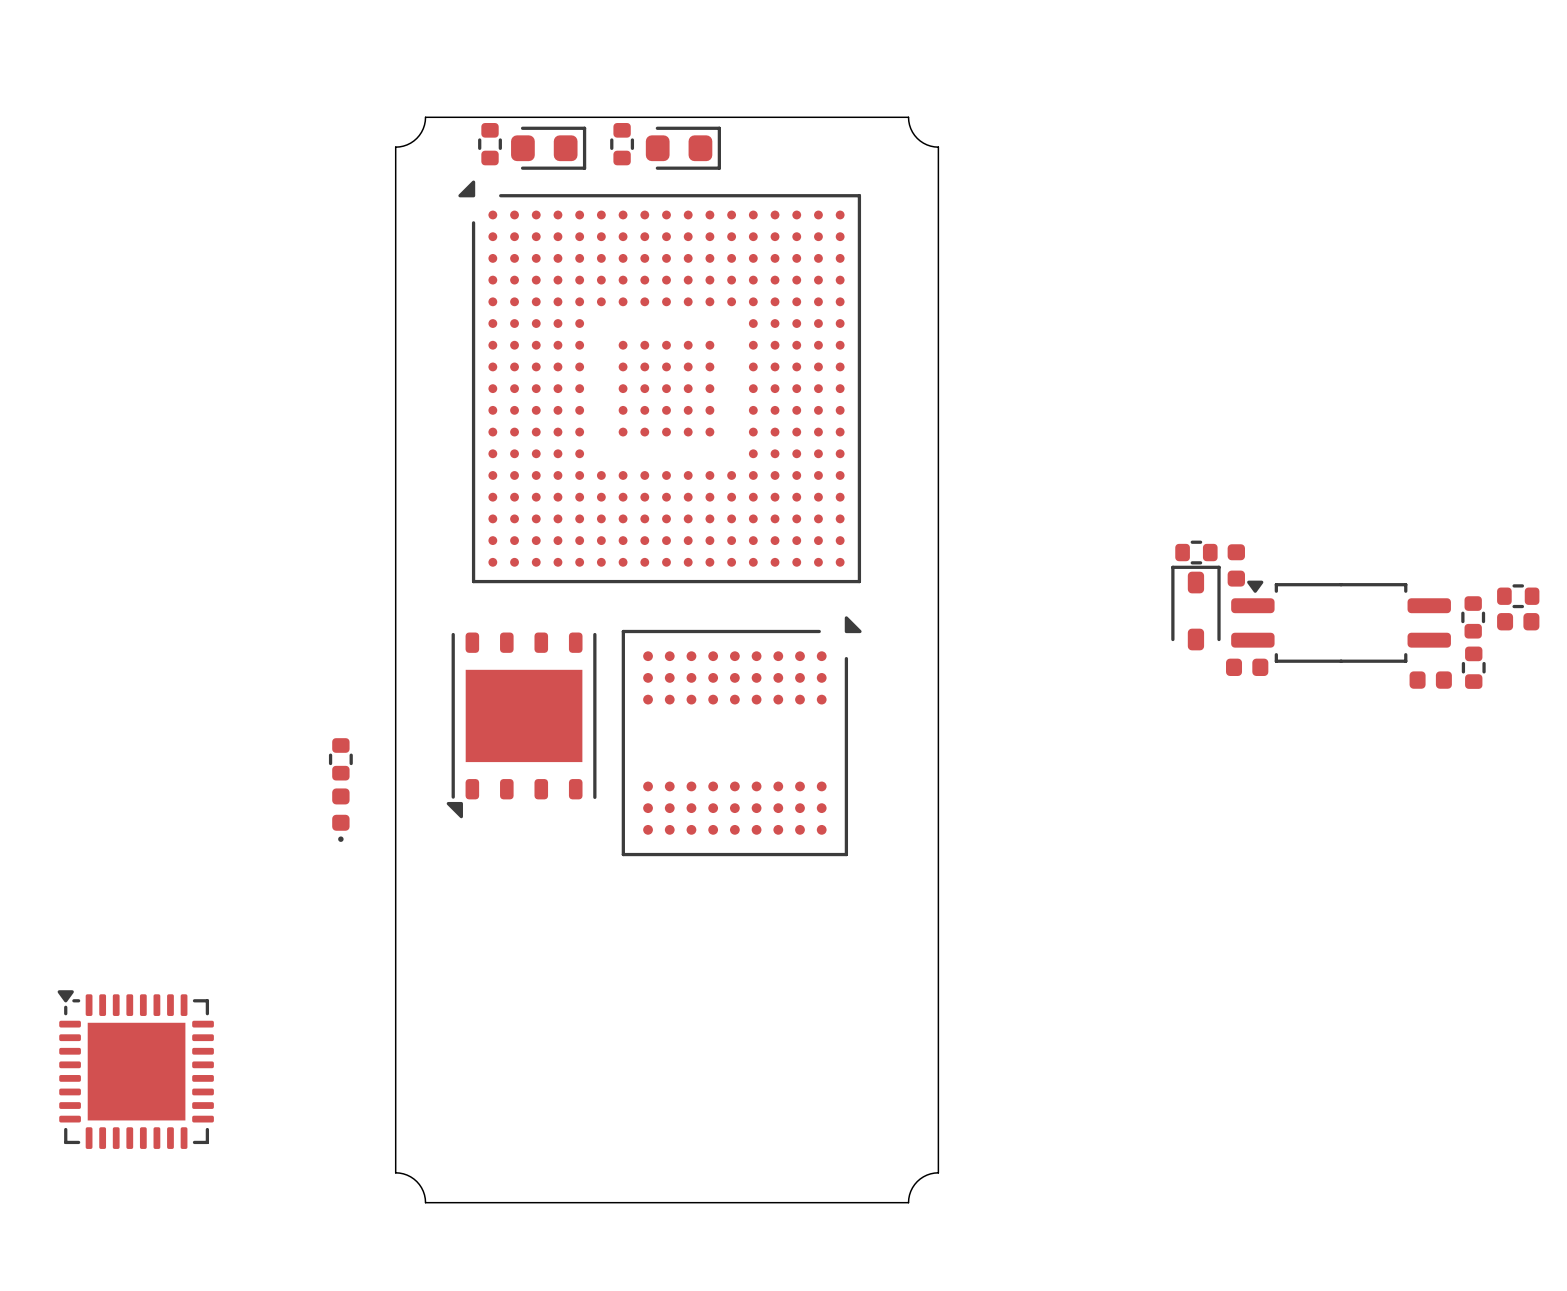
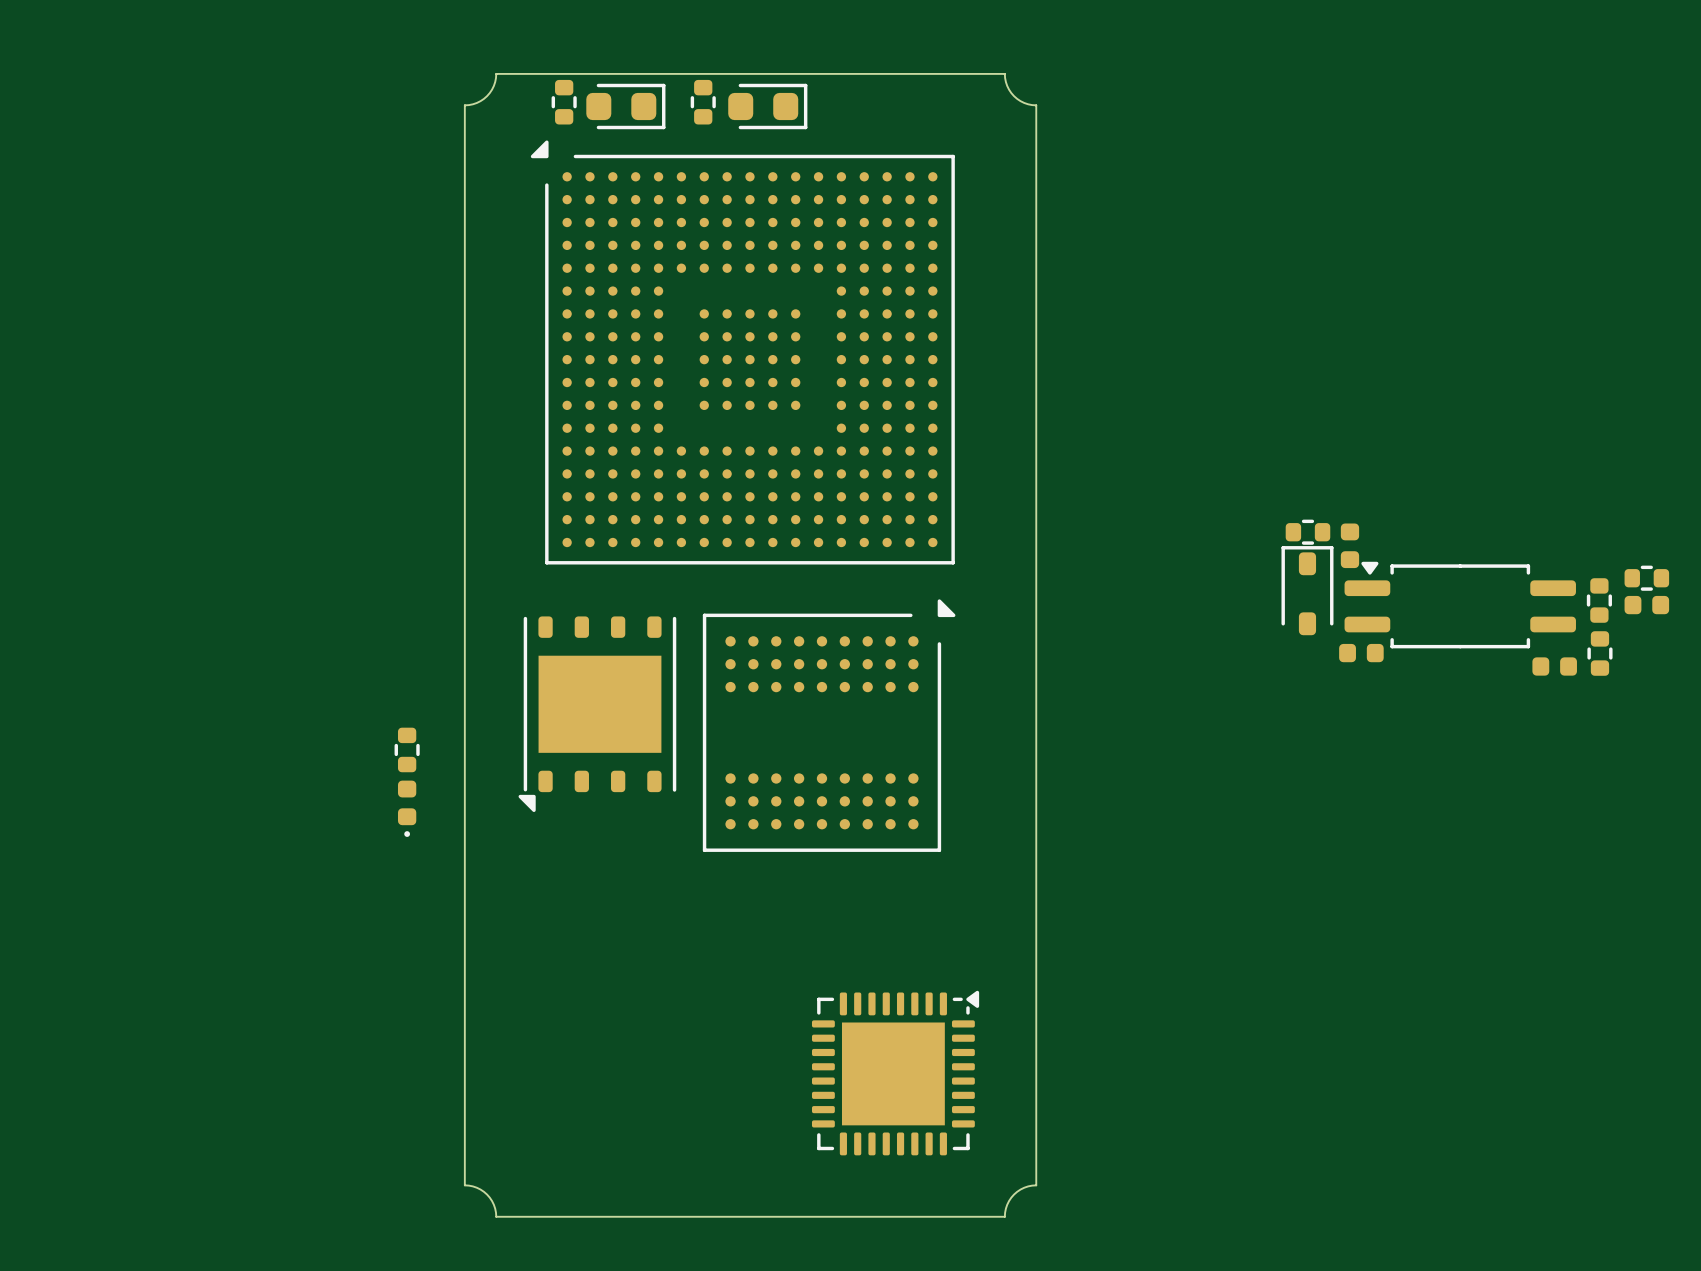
part rotation: 0° (135, 1069) -> 90° clockwise (895, 1073)
part position: (135, 1069) -> (895, 1073)

